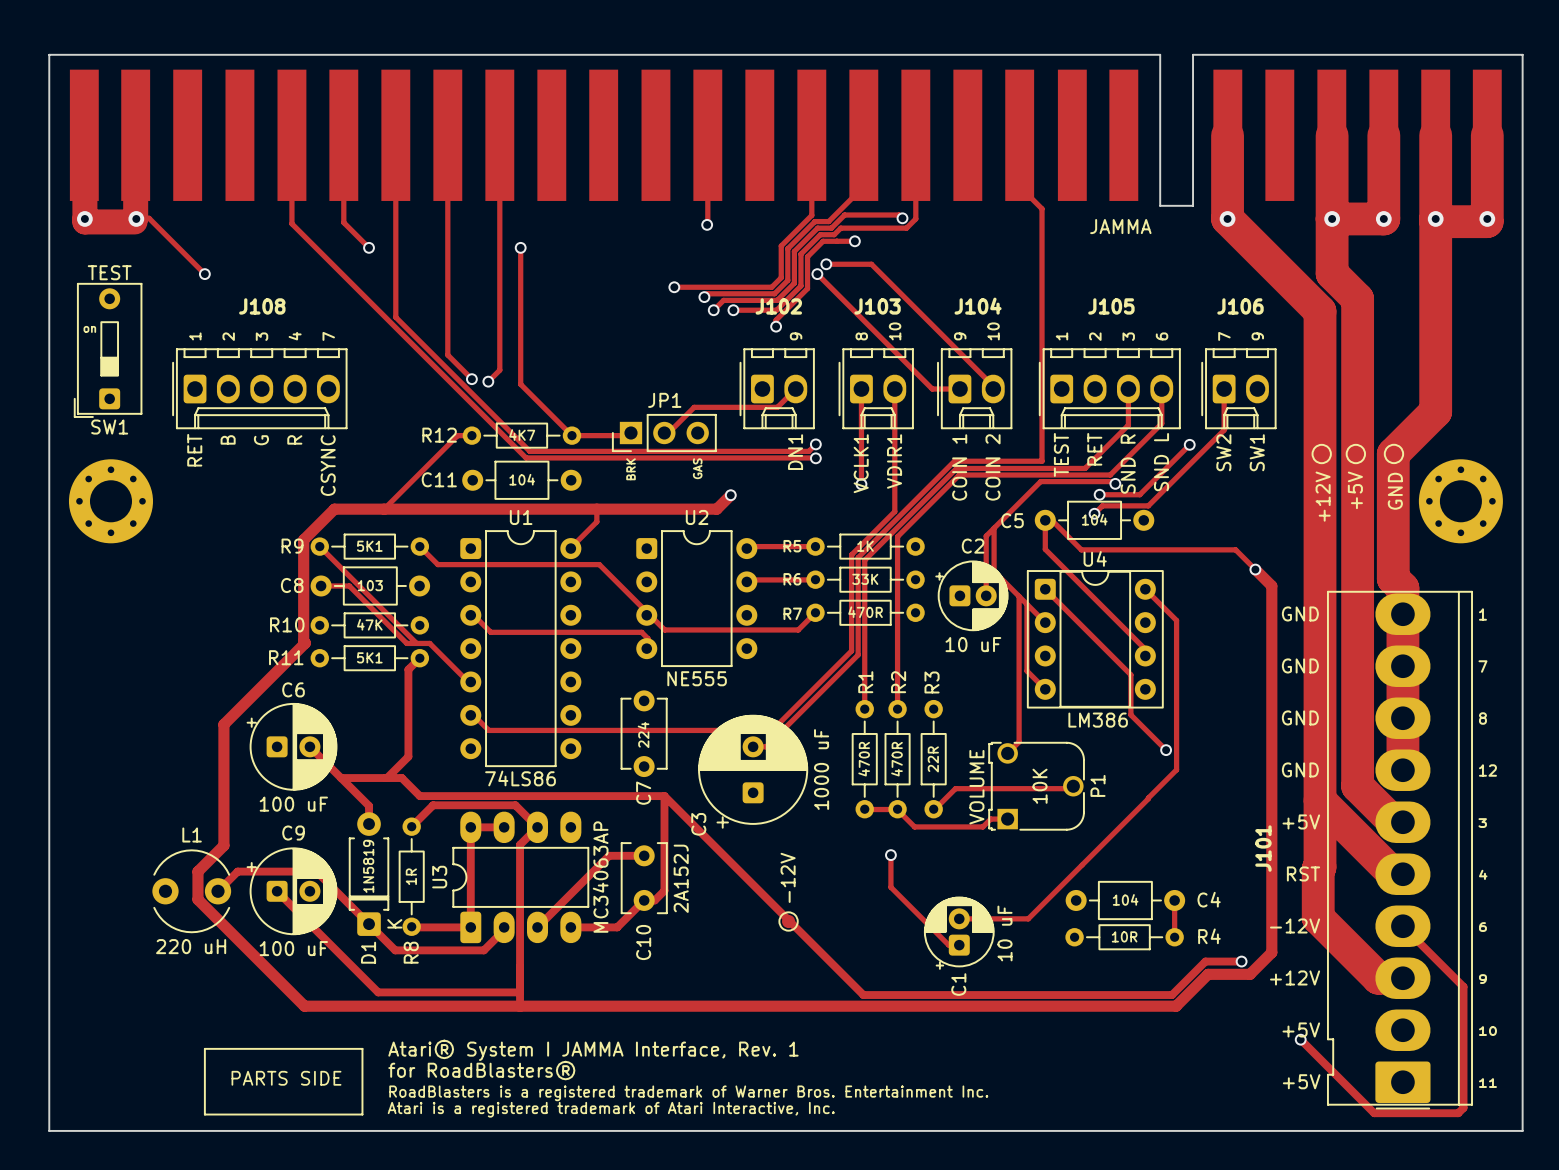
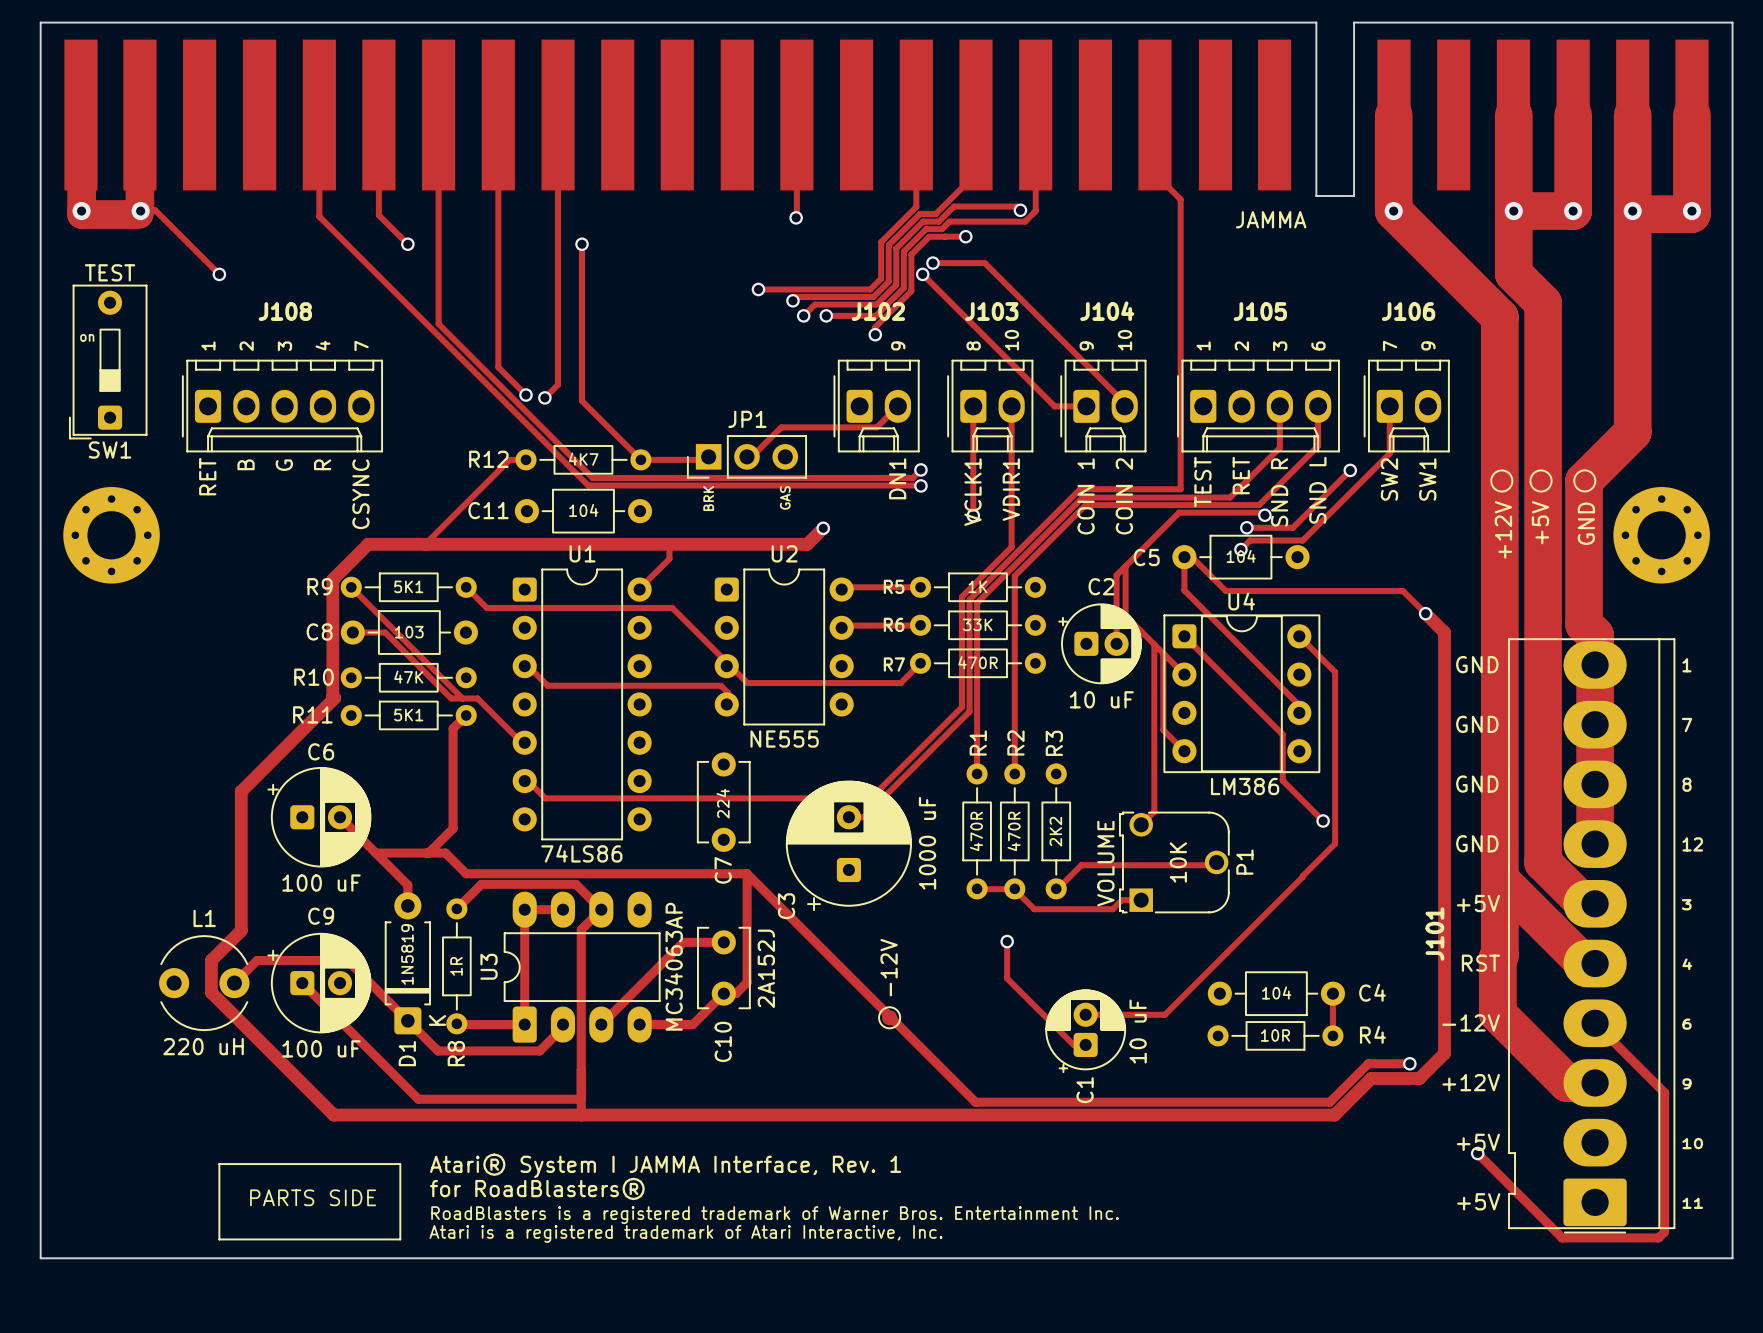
R3 value: 22R (933, 759) -> 2K2 (1055, 831)

